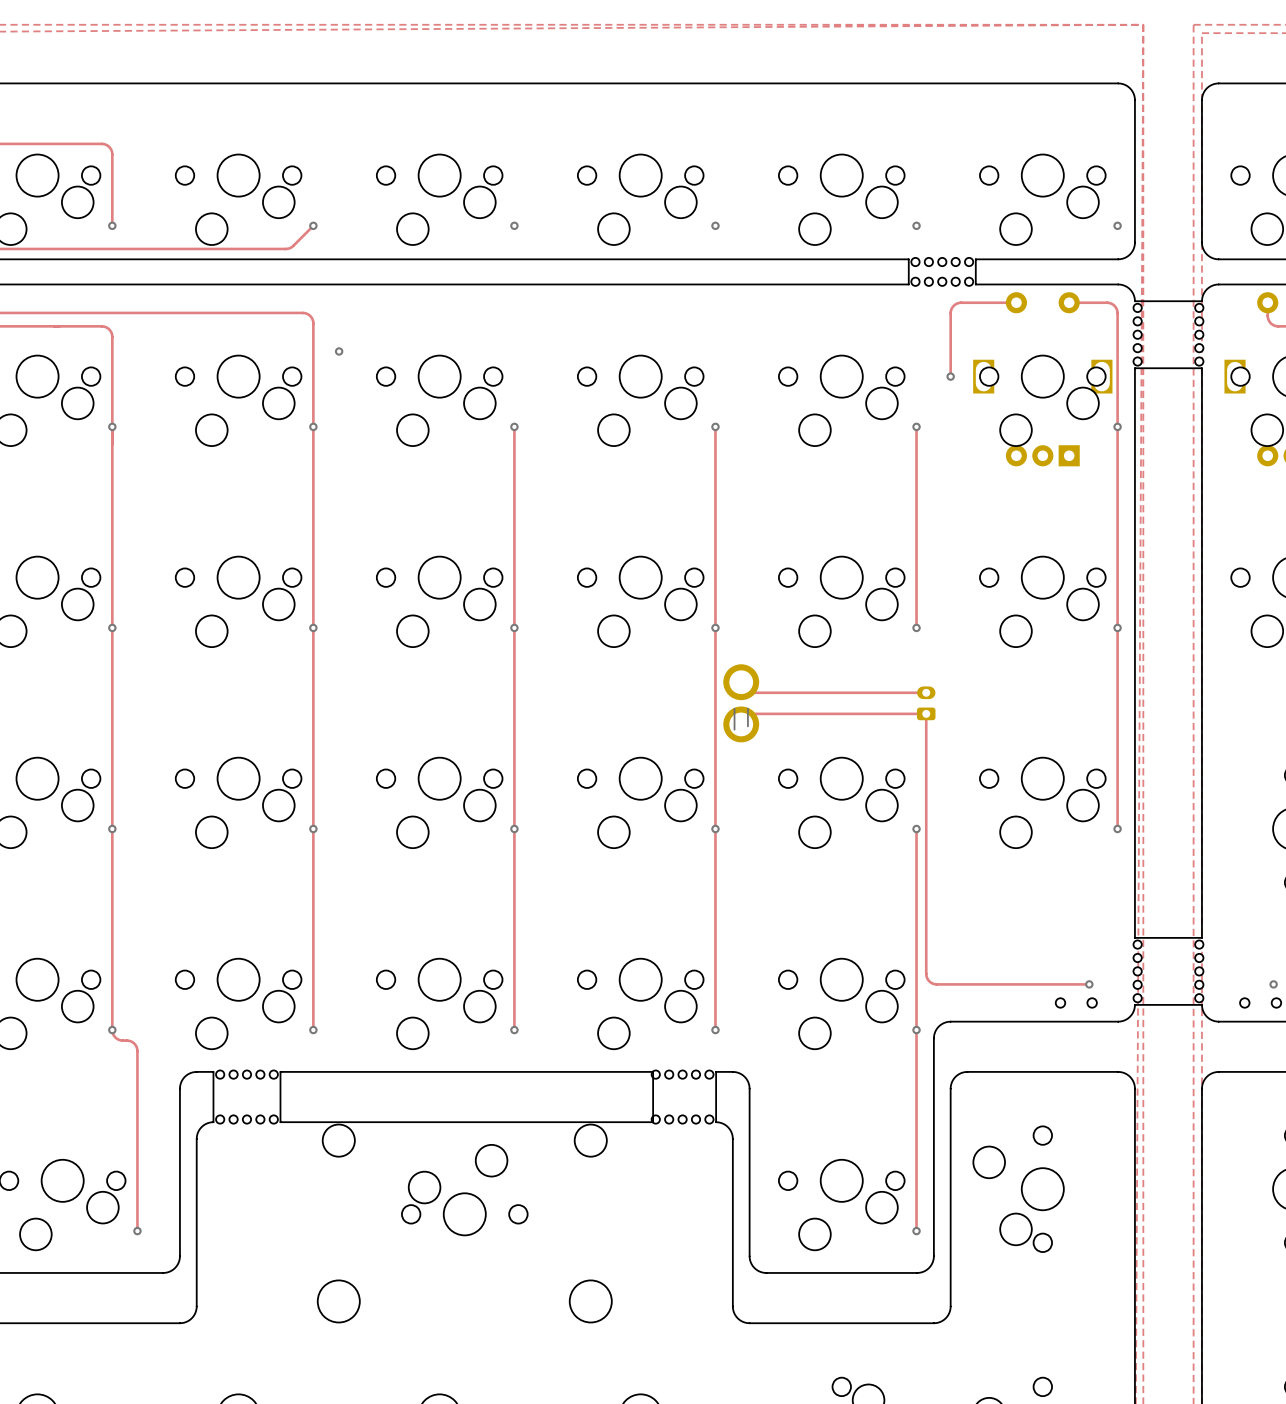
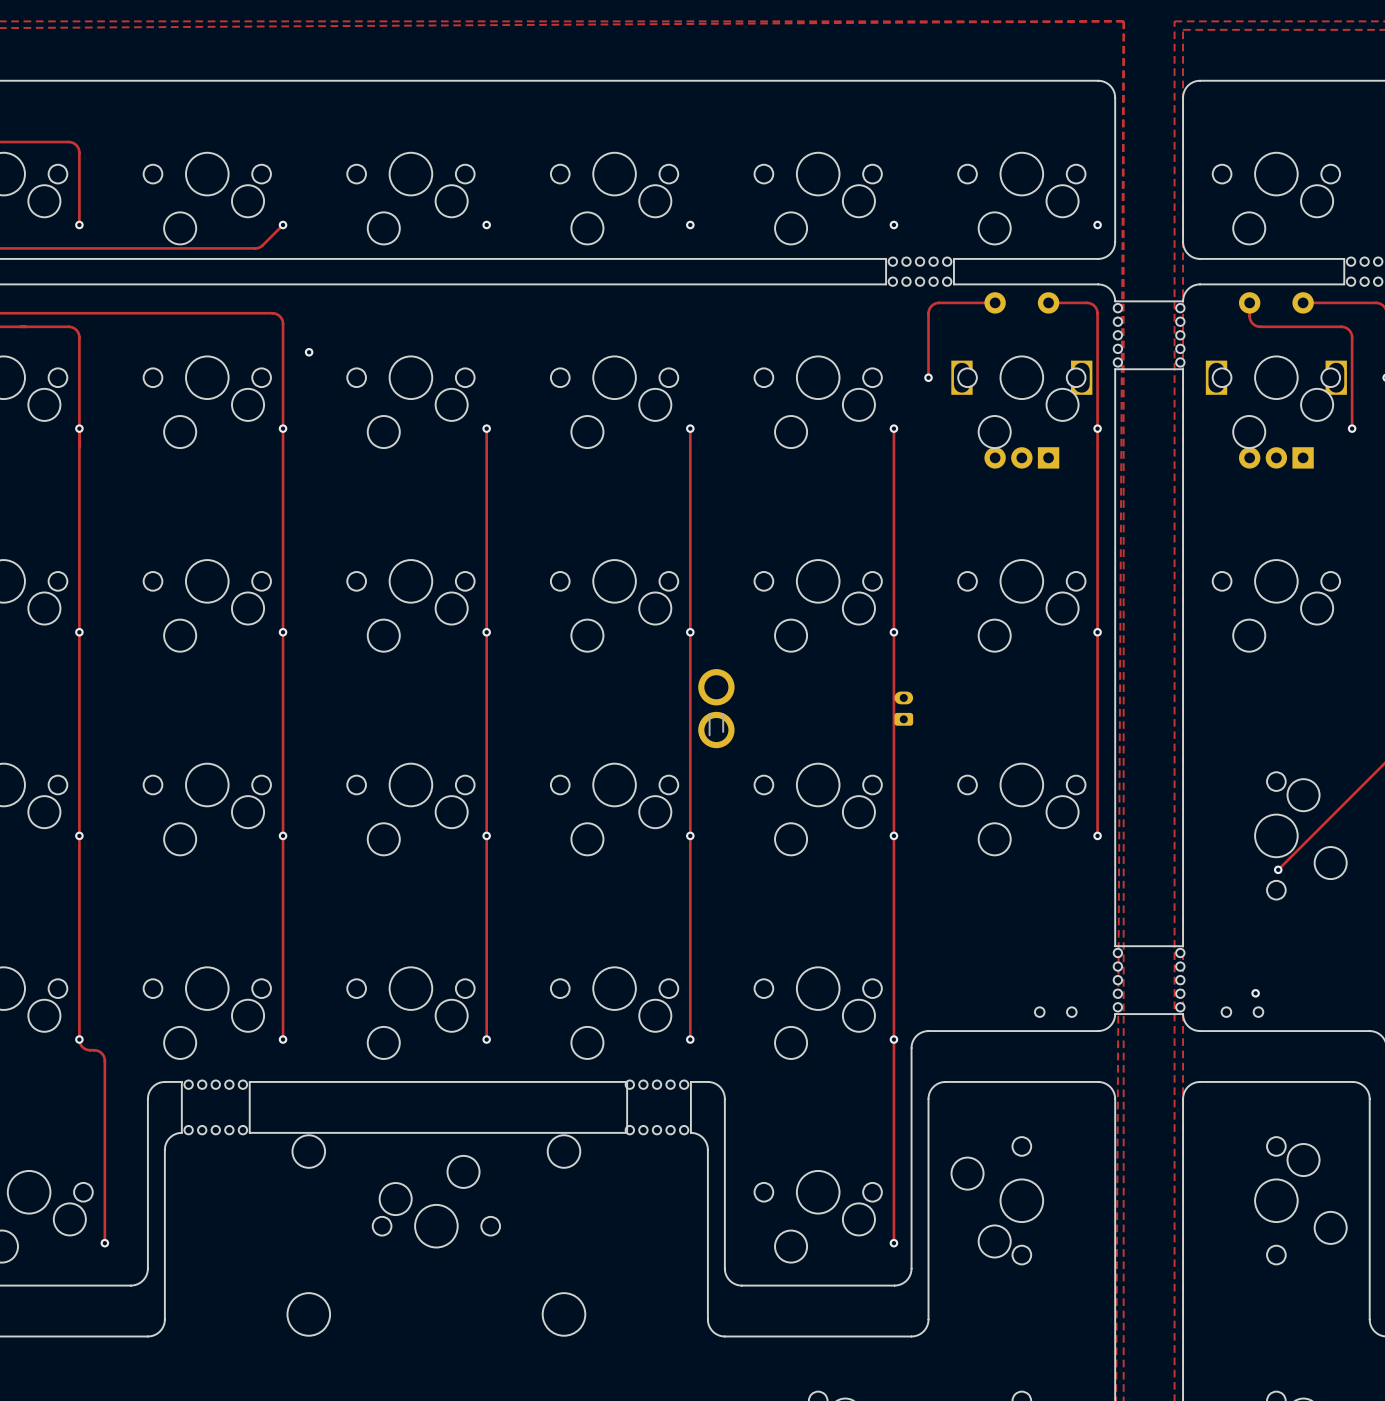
track: none -> (893, 632) (893, 835)
track: (741, 682) (751, 692) (926, 692) -> none
track: (741, 724) (751, 713) (926, 713) (926, 973) (927, 979) (936, 984) (1089, 984) -> none
via: (1089, 984) -> none

